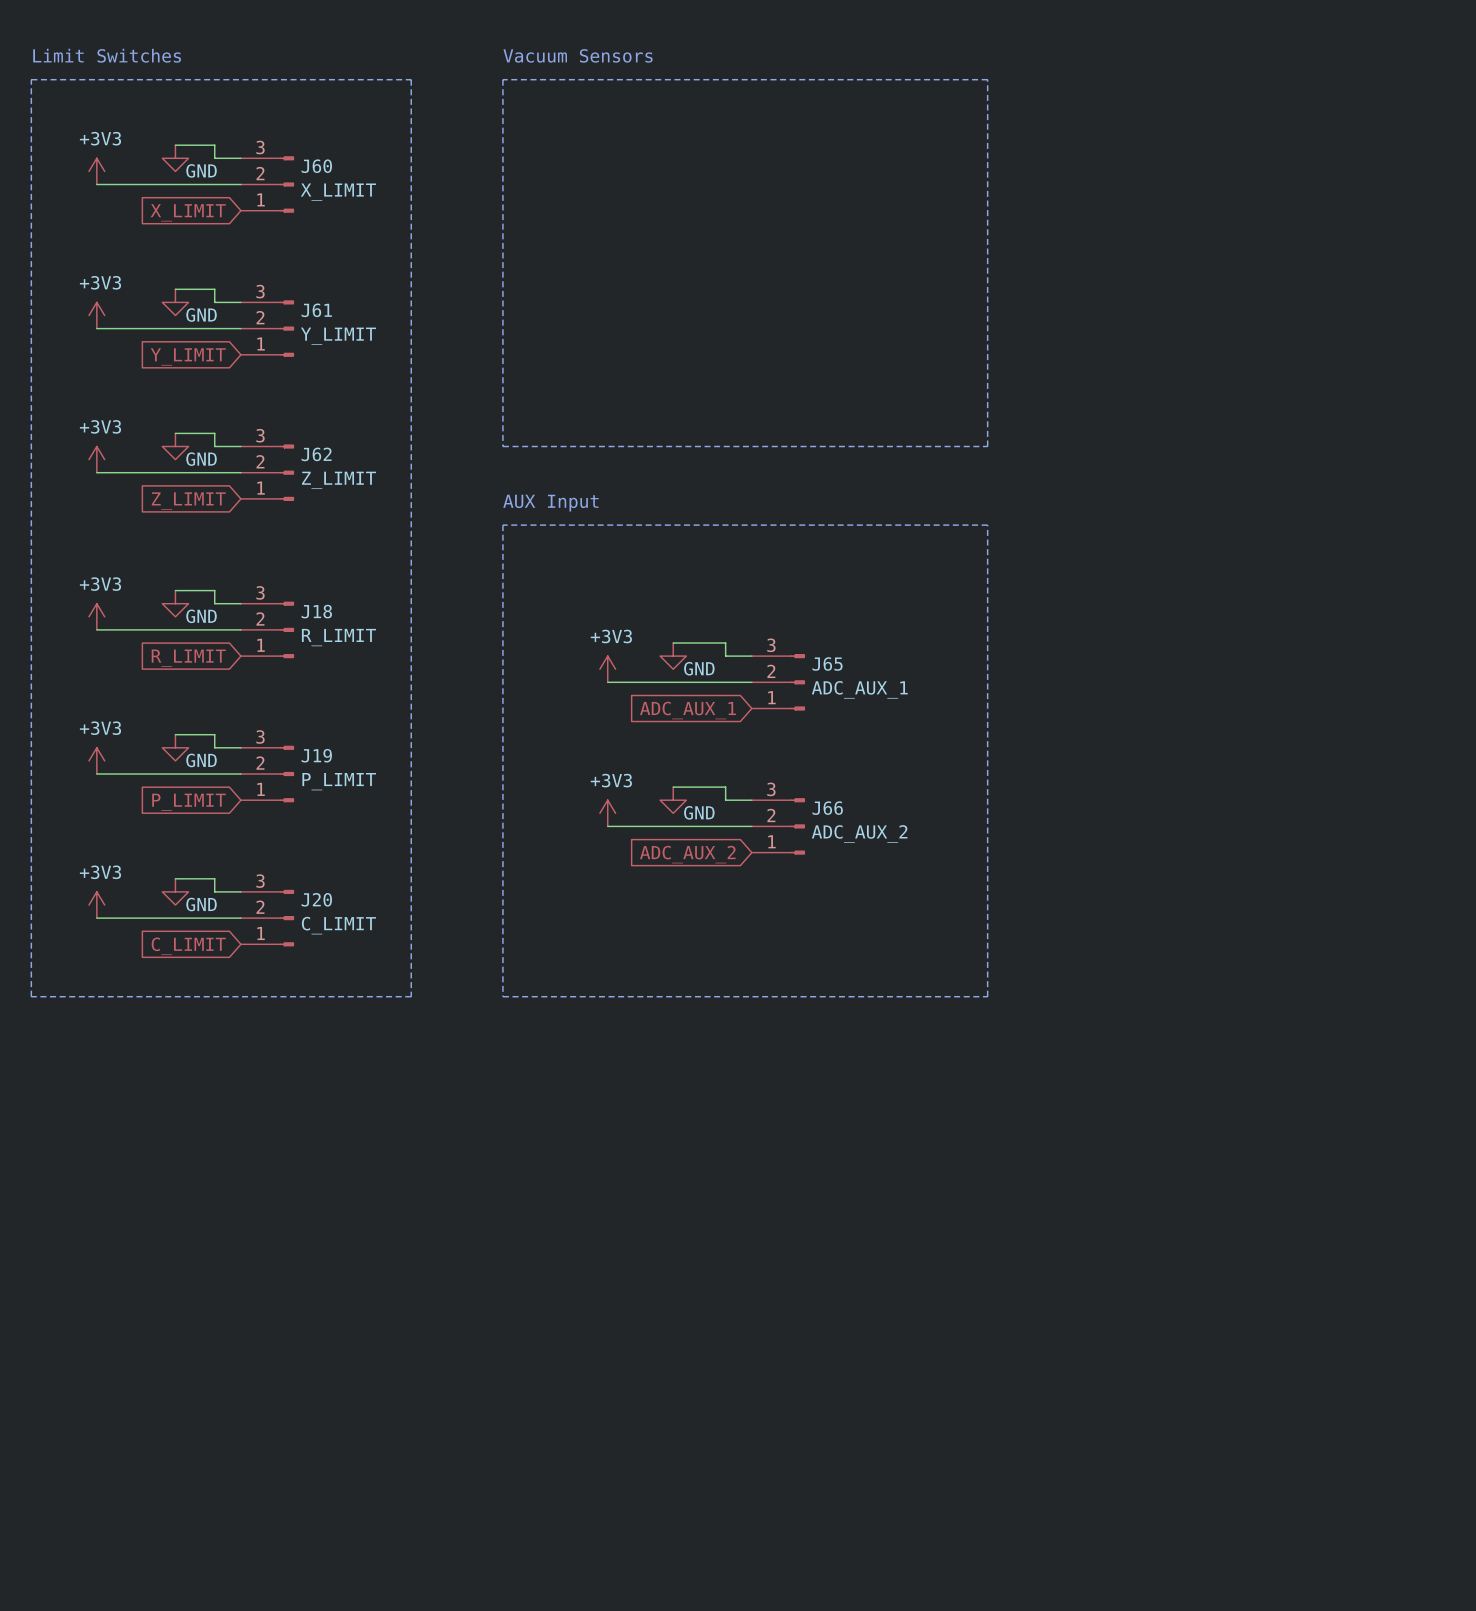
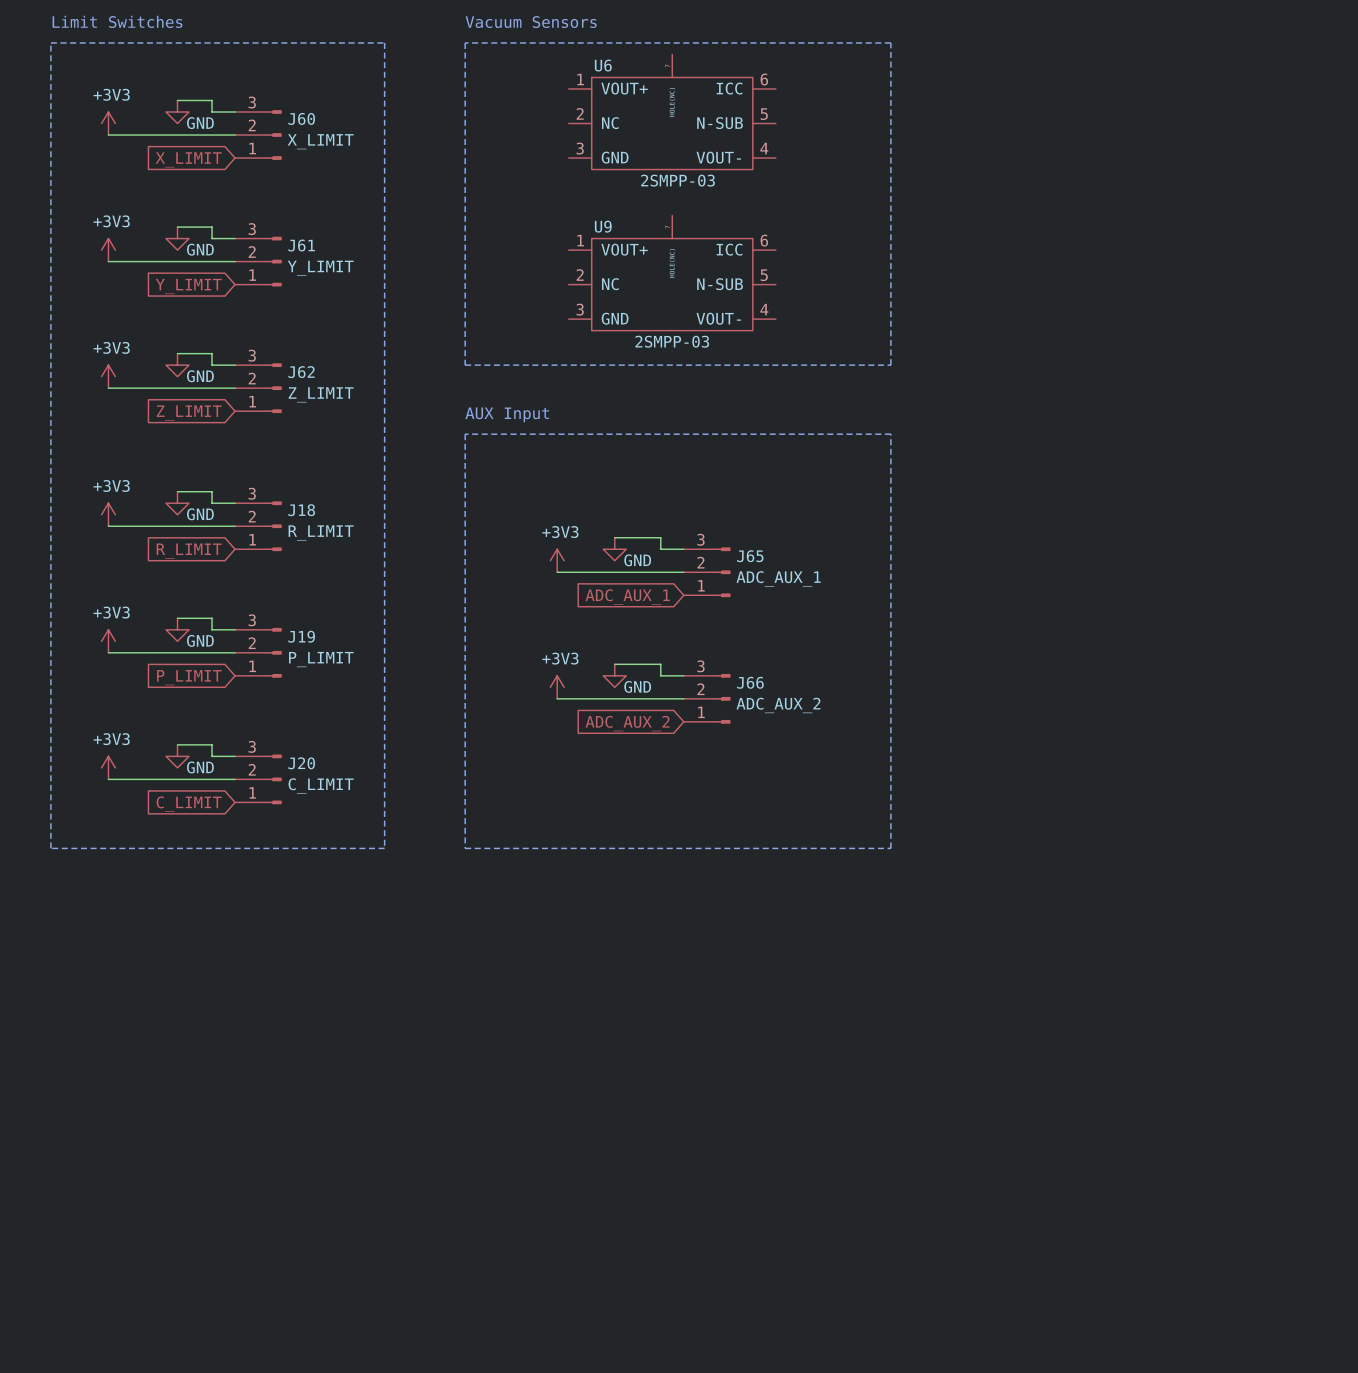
U6: none -> 2SMPP-03 (672, 112)
U9: none -> 2SMPP-03 (672, 273)

